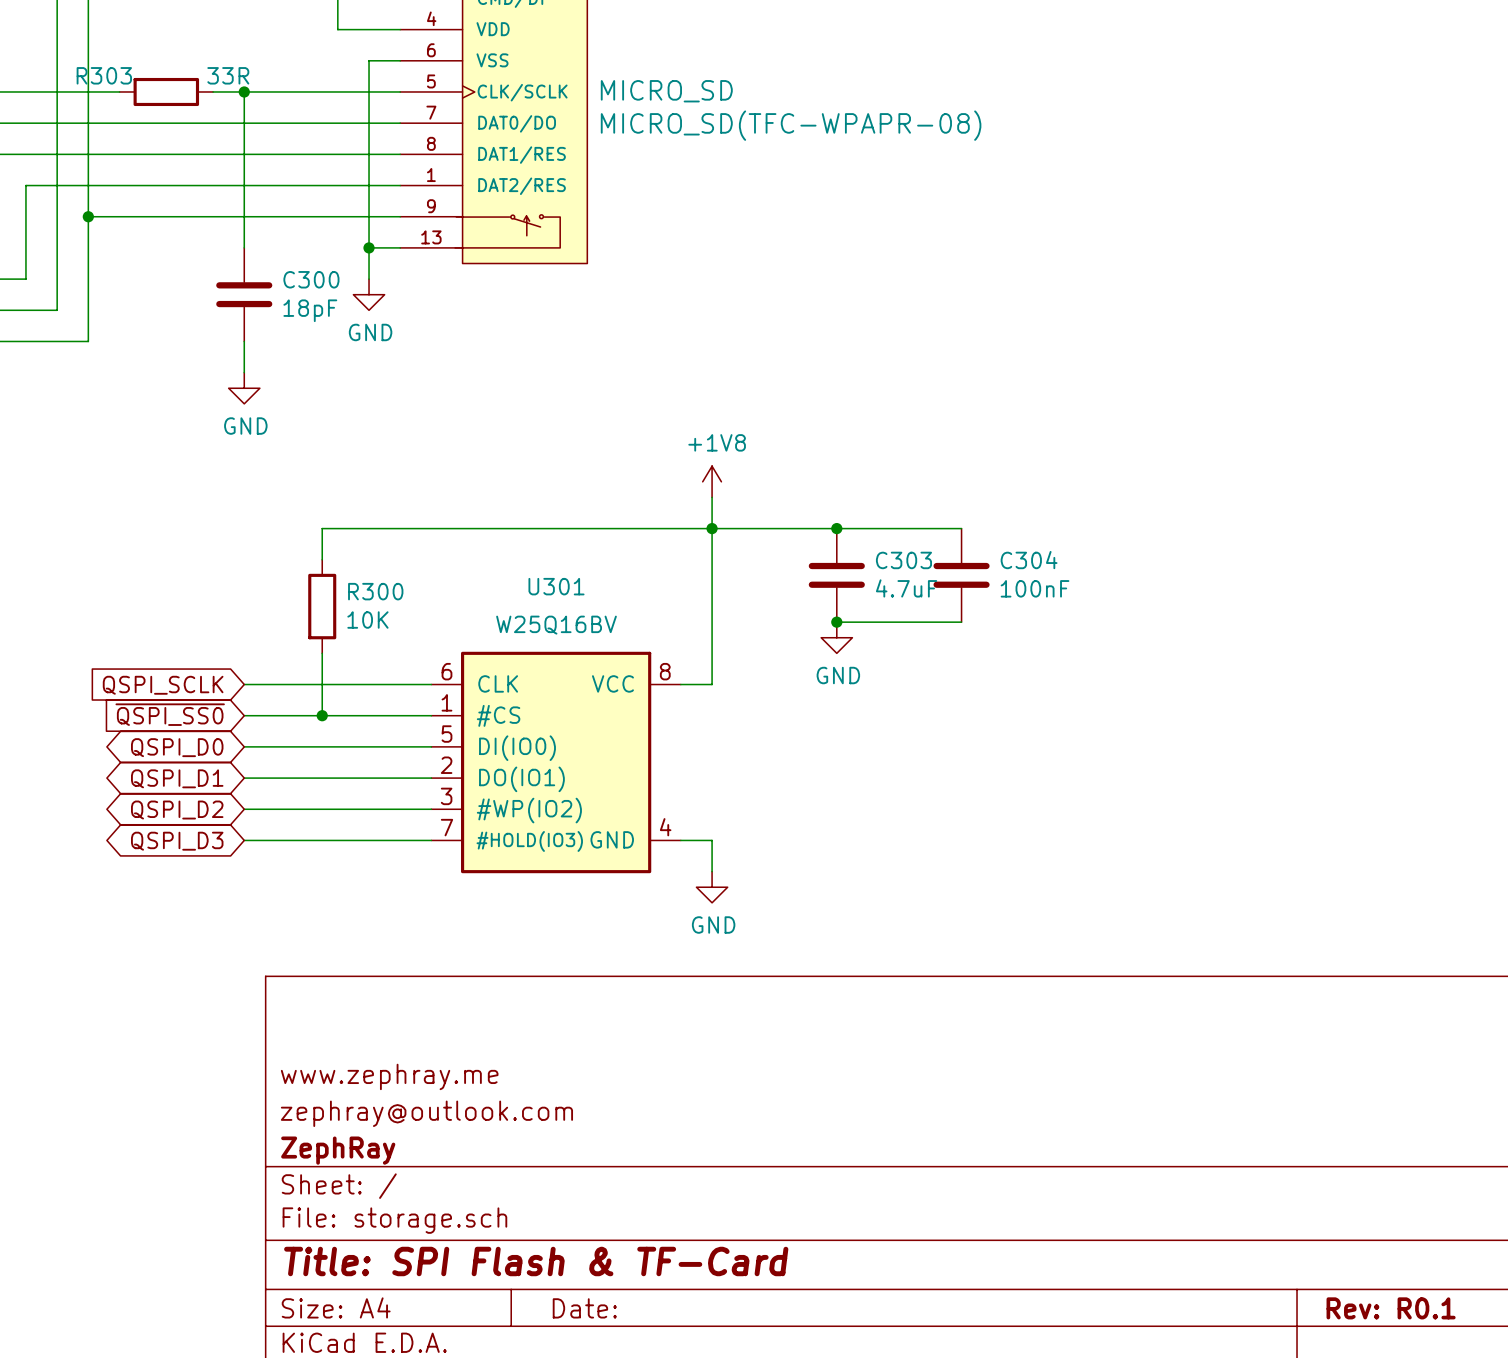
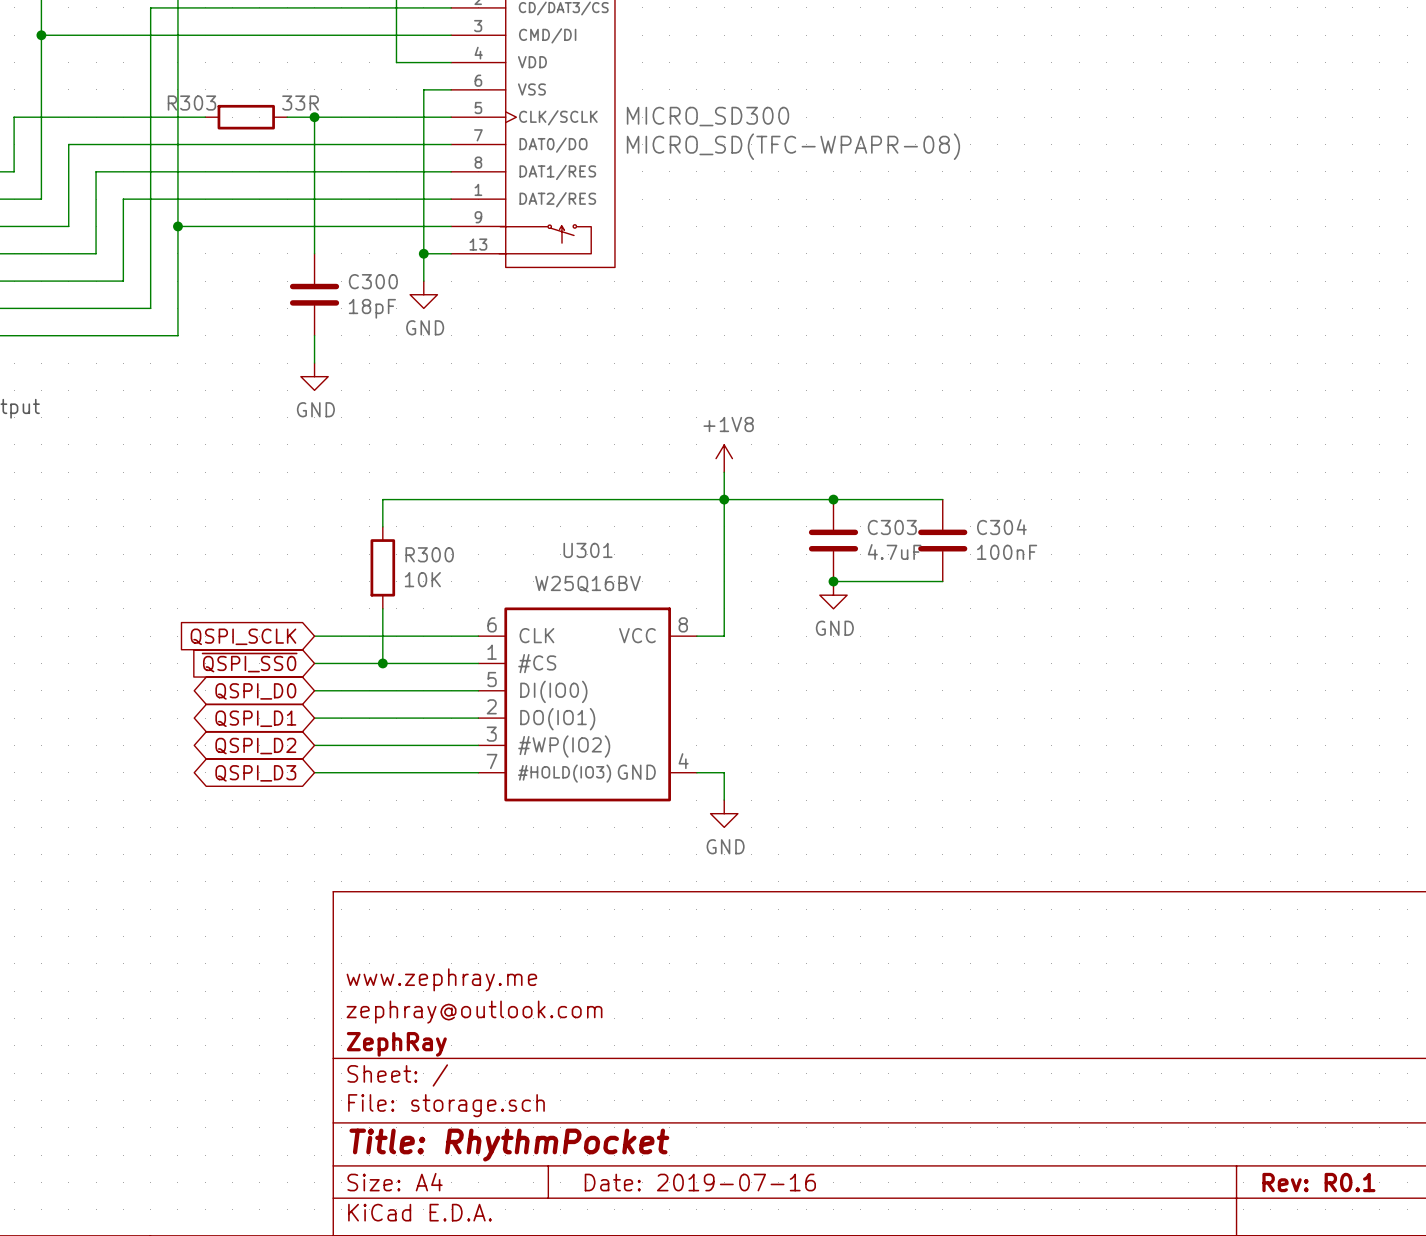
MICRO_SD name: MICRO_SD (666, 91) -> MICRO_SD300 (707, 116)
title block: Title: SPI Flash & TF-Card (536, 1261) -> Title: RhythmPocket (509, 1145)
title block: Date: (584, 1308) -> Date: 2019-07-16 (700, 1182)

